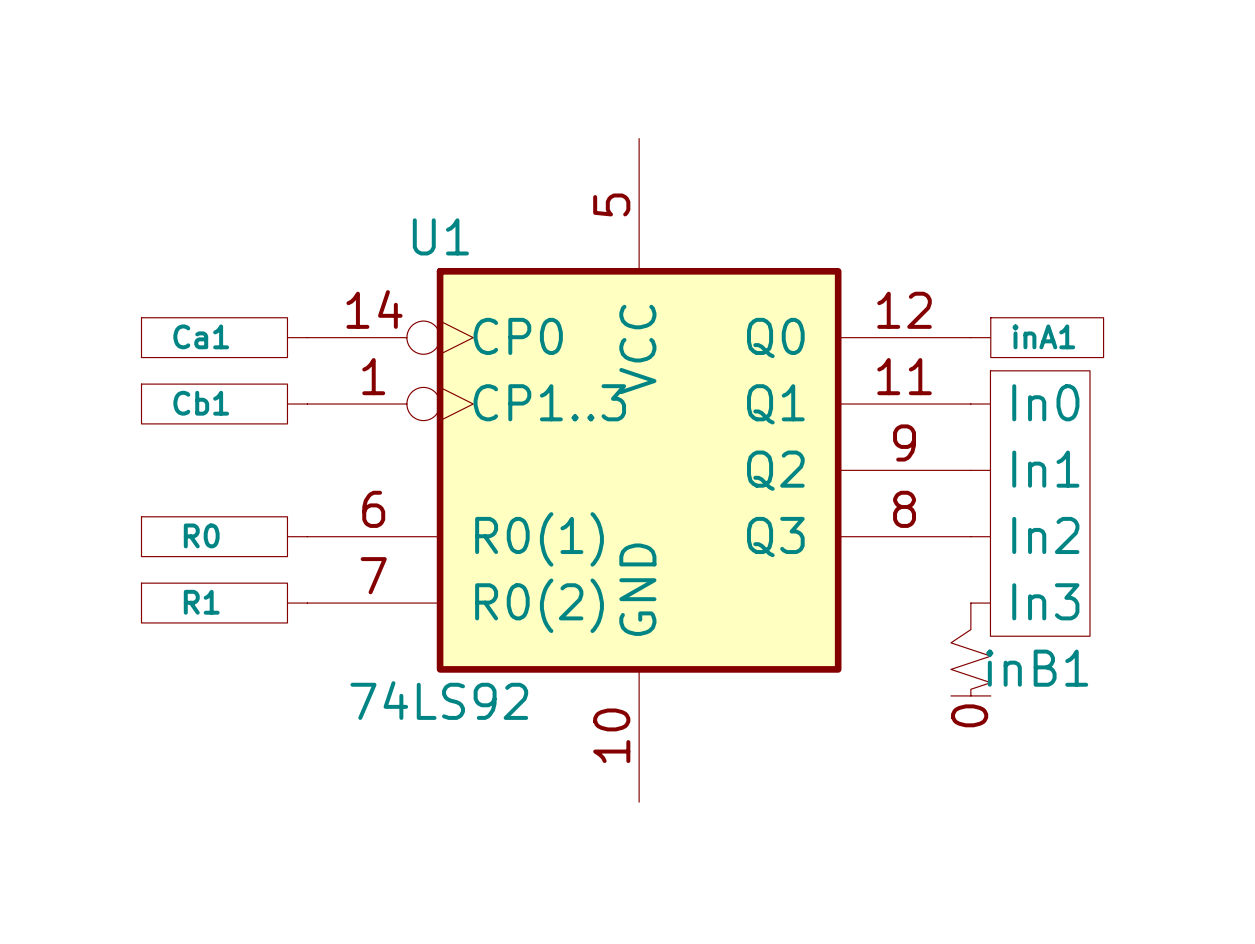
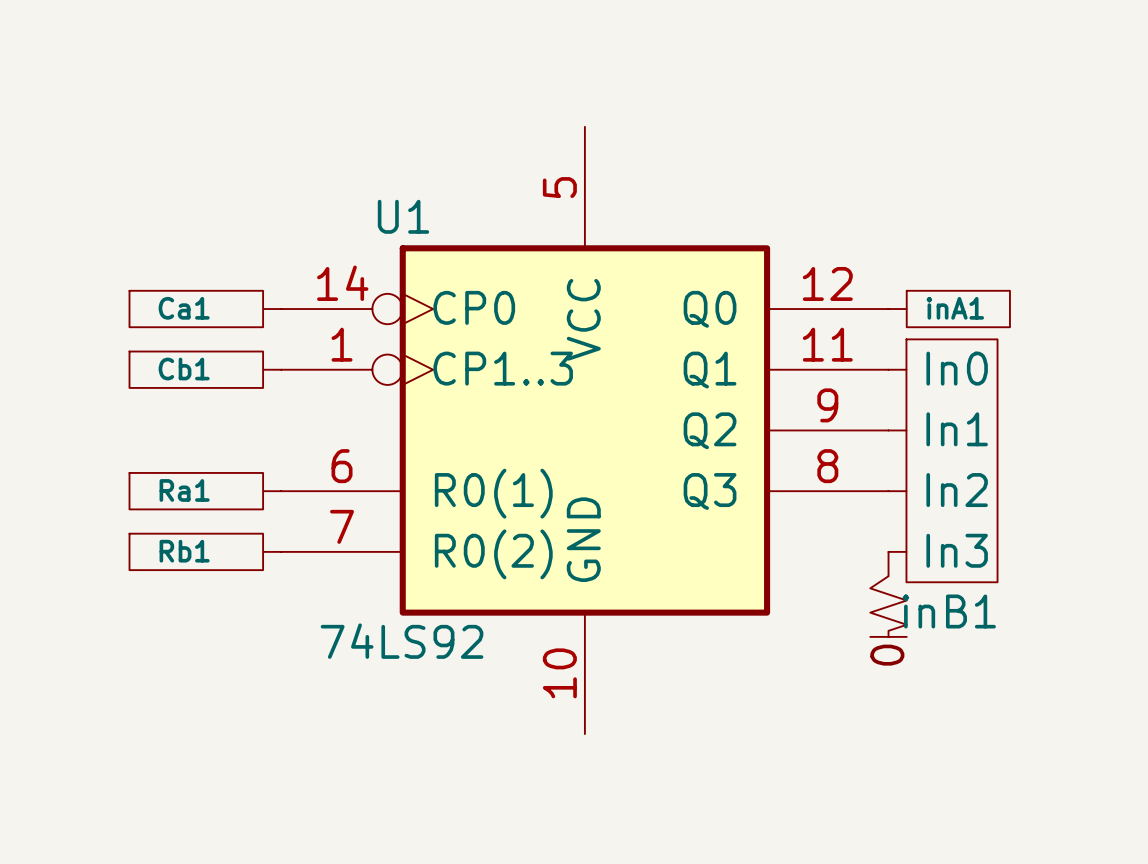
R0 name: R0 (201, 535) -> Ra1 (184, 490)
R1 name: R1 (201, 602) -> Rb1 (184, 551)

